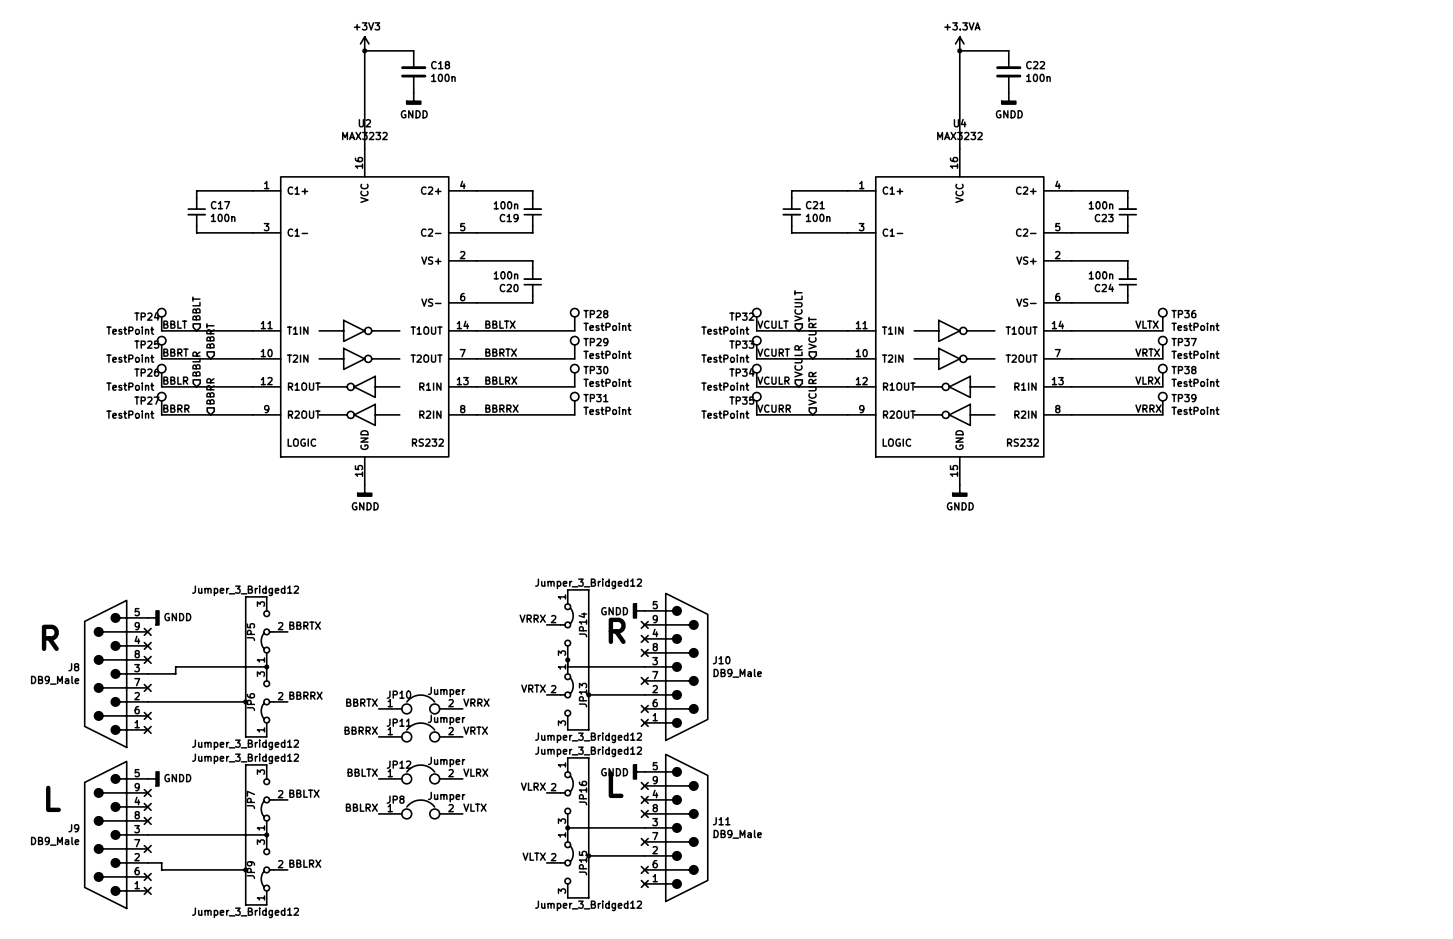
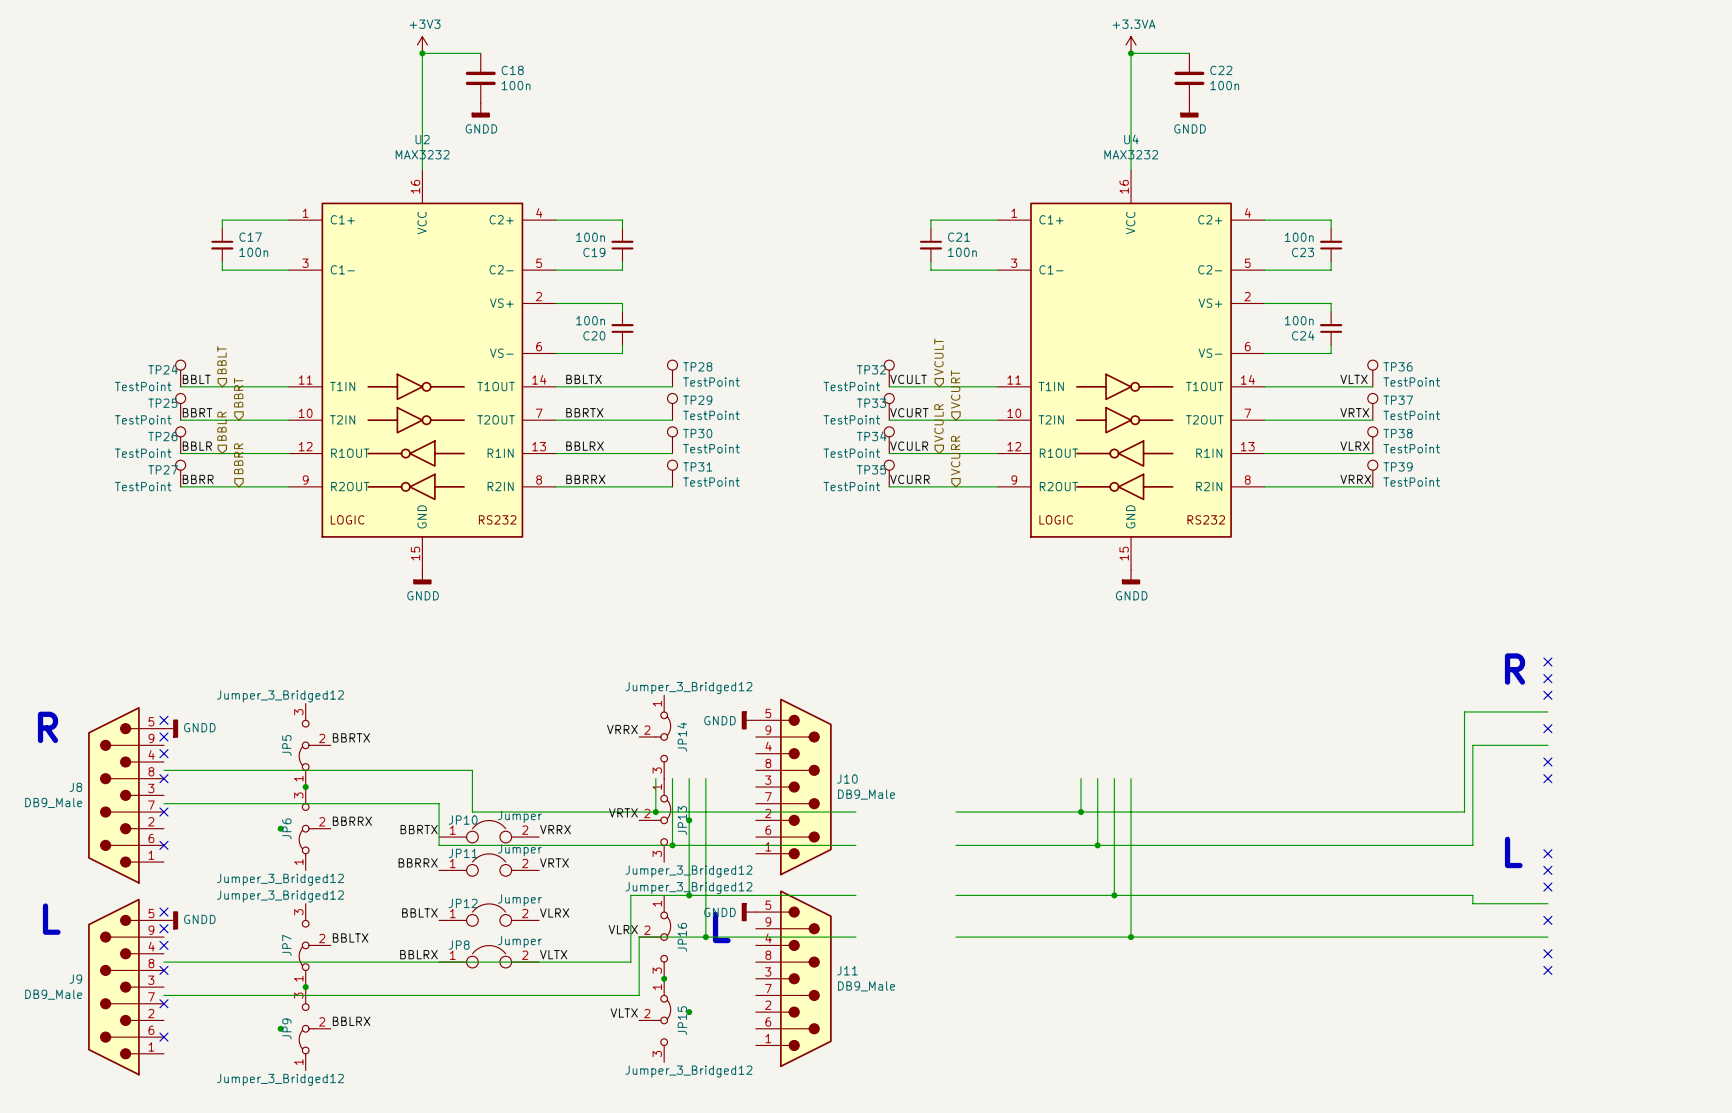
no-connect mark: none -> (1547, 661)
text: none -> R (1515, 669)
no-connect mark: none -> (1547, 678)
wire: (567, 589) (588, 589) (588, 659) -> none
no-connect mark: none -> (1547, 695)
wire: (266, 596) (245, 596) (245, 736) (266, 736) -> none
wire: none -> (1547, 711) (1464, 711) (1464, 812) (955, 812)
no-connect mark: none -> (163, 720)
no-connect mark: none -> (1547, 728)
no-connect mark: none -> (163, 736)
no-connect mark: (644, 624) -> none
text: R (617, 630) -> none
no-connect mark: (147, 631) -> none
wire: none -> (1547, 745) (1472, 745) (1472, 845) (955, 845)
text position: R (50, 637) -> R (48, 727)
no-connect mark: none -> (163, 753)
no-connect mark: (644, 638) -> none
no-connect mark: (147, 645) -> none
no-connect mark: none -> (1547, 762)
wire: none -> (163, 770) (472, 770) (472, 812) (855, 812)
no-connect mark: (644, 652) -> none
wire: none -> (655, 778) (655, 812)
wire: (567, 659) (567, 666) (644, 666) -> none
junction: (567, 659) -> none
wire: none -> (672, 778) (672, 845)
wire: none -> (705, 778) (705, 937)
wire: none -> (1081, 778) (1081, 812)
wire: none -> (1097, 778) (1097, 845)
wire: none -> (1114, 778) (1114, 895)
wire: none -> (1131, 778) (1131, 937)
no-connect mark: none -> (1547, 778)
wire: (266, 666) (175, 666) (175, 673) (147, 673) -> none
wire: none -> (163, 803) (439, 803) (439, 845) (855, 845)
no-connect mark: (644, 680) -> none
junction: none -> (655, 812)
junction: none -> (1081, 812)
wire: (588, 694) (644, 694) -> none
wire: (147, 701) (245, 701) -> none
no-connect mark: (644, 708) -> none
junction: none -> (672, 845)
junction: none -> (1097, 845)
text: none -> L (1513, 852)
no-connect mark: (644, 722) -> none
no-connect mark: none -> (1547, 853)
no-connect mark: (147, 729) -> none
wire: (567, 729) (588, 729) -> (855, 895) (689, 895) (689, 862)
no-connect mark: none -> (1547, 870)
no-connect mark: none -> (1547, 887)
wire: none -> (664, 895) (630, 895) (630, 962) (163, 962)
wire: (588, 757) (588, 897) (567, 897) -> none
junction: none -> (689, 895)
wire: none -> (955, 895) (1472, 895) (1472, 903) (1547, 903)
junction: none -> (1114, 895)
wire: (266, 764) (245, 764) (245, 904) (266, 904) -> none
no-connect mark: none -> (163, 912)
no-connect mark: none -> (1547, 920)
no-connect mark: none -> (163, 928)
no-connect mark: (644, 785) -> none
no-connect mark: (147, 792) -> none
junction: none -> (705, 937)
wire: none -> (855, 937) (639, 937) (639, 995) (163, 995)
wire: none -> (955, 937) (1547, 937)
junction: none -> (1131, 937)
text position: L (53, 798) -> L (51, 919)
no-connect mark: none -> (163, 945)
no-connect mark: (644, 799) -> none
no-connect mark: (147, 806) -> none
no-connect mark: none -> (1547, 953)
no-connect mark: (644, 813) -> none
no-connect mark: none -> (1547, 970)
wire: (567, 827) (644, 827) -> none
wire: (147, 834) (266, 834) -> none
no-connect mark: (644, 841) -> none
wire: (588, 855) (644, 855) -> none
wire: (147, 862) (161, 862) (161, 869) (245, 869) -> none
no-connect mark: (644, 869) -> none
no-connect mark: (644, 883) -> none
no-connect mark: (147, 890) -> none

